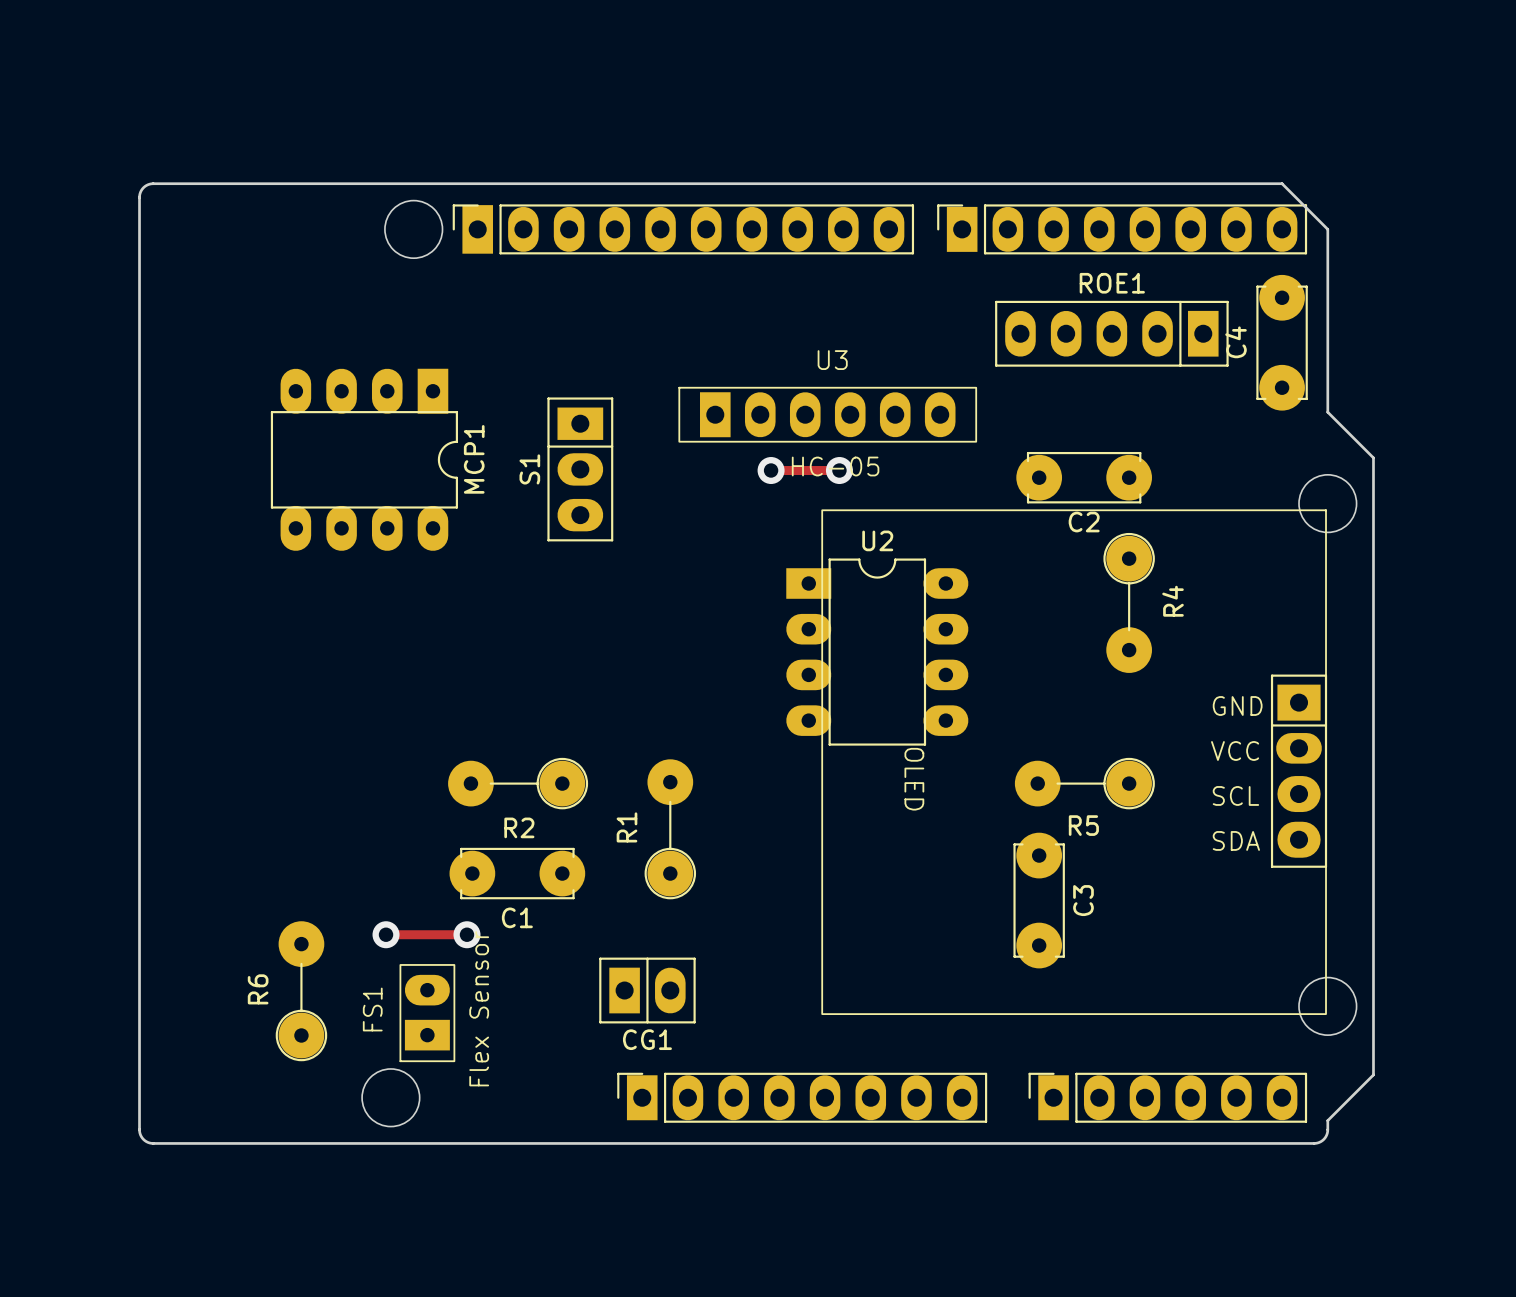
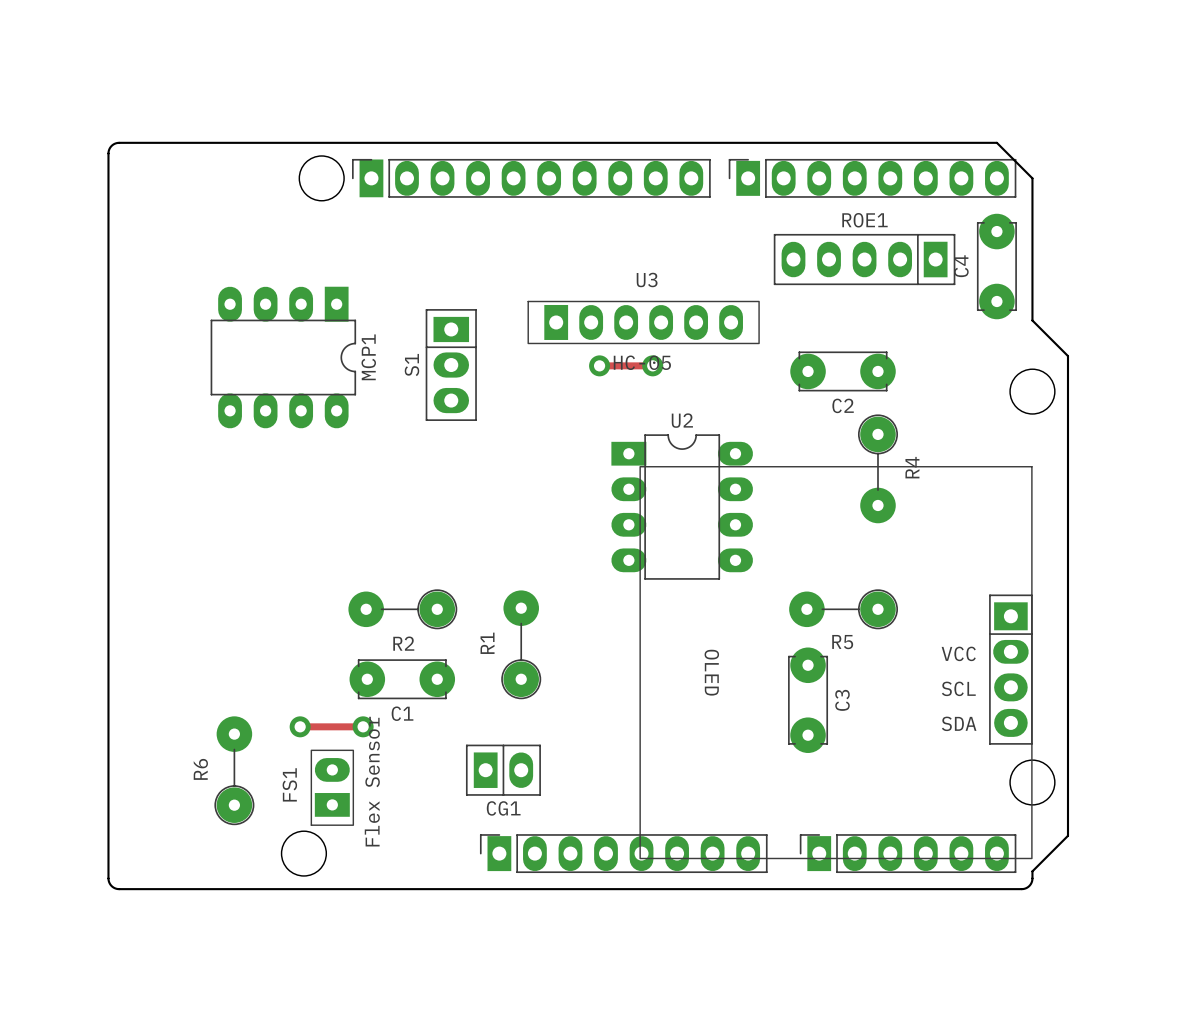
part: (1074, 762) -> none
part: none -> (836, 662)

